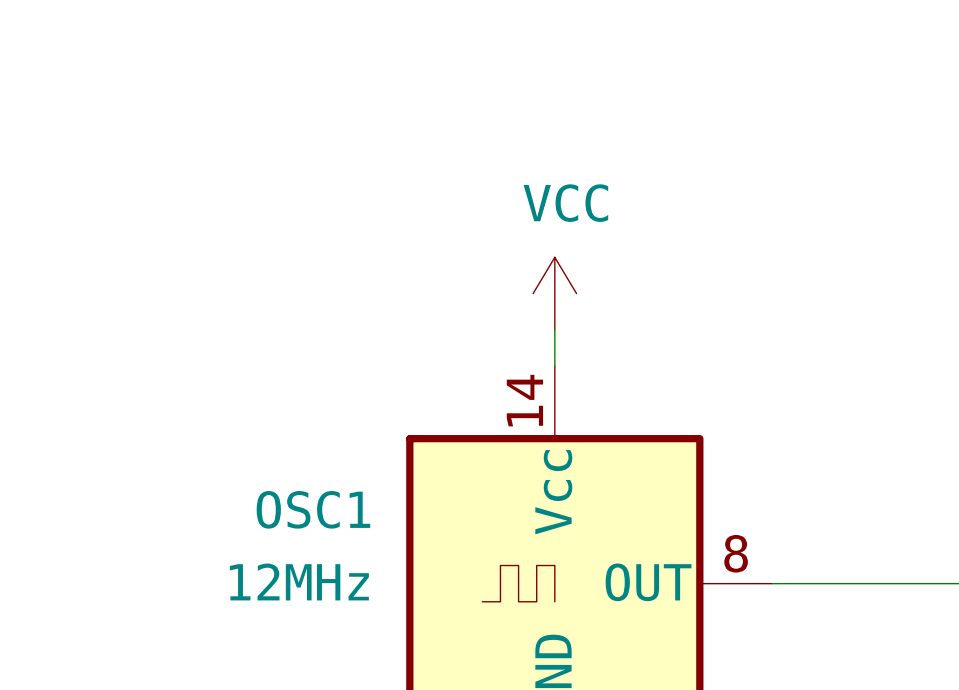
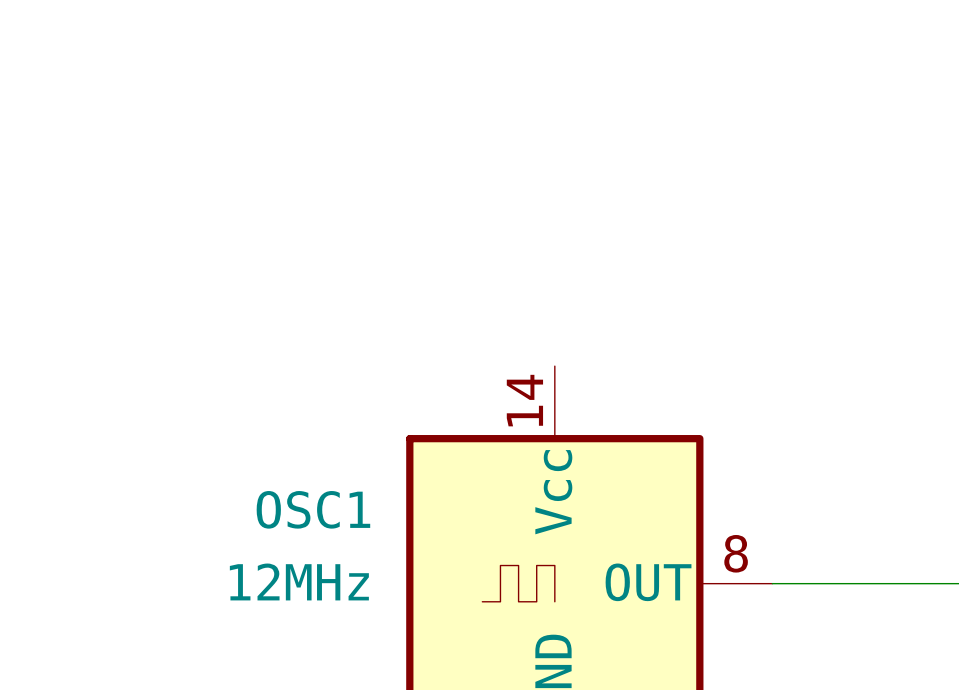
power symbol: VCC (554, 293) -> none
wire: (554, 329) (554, 366) -> none

